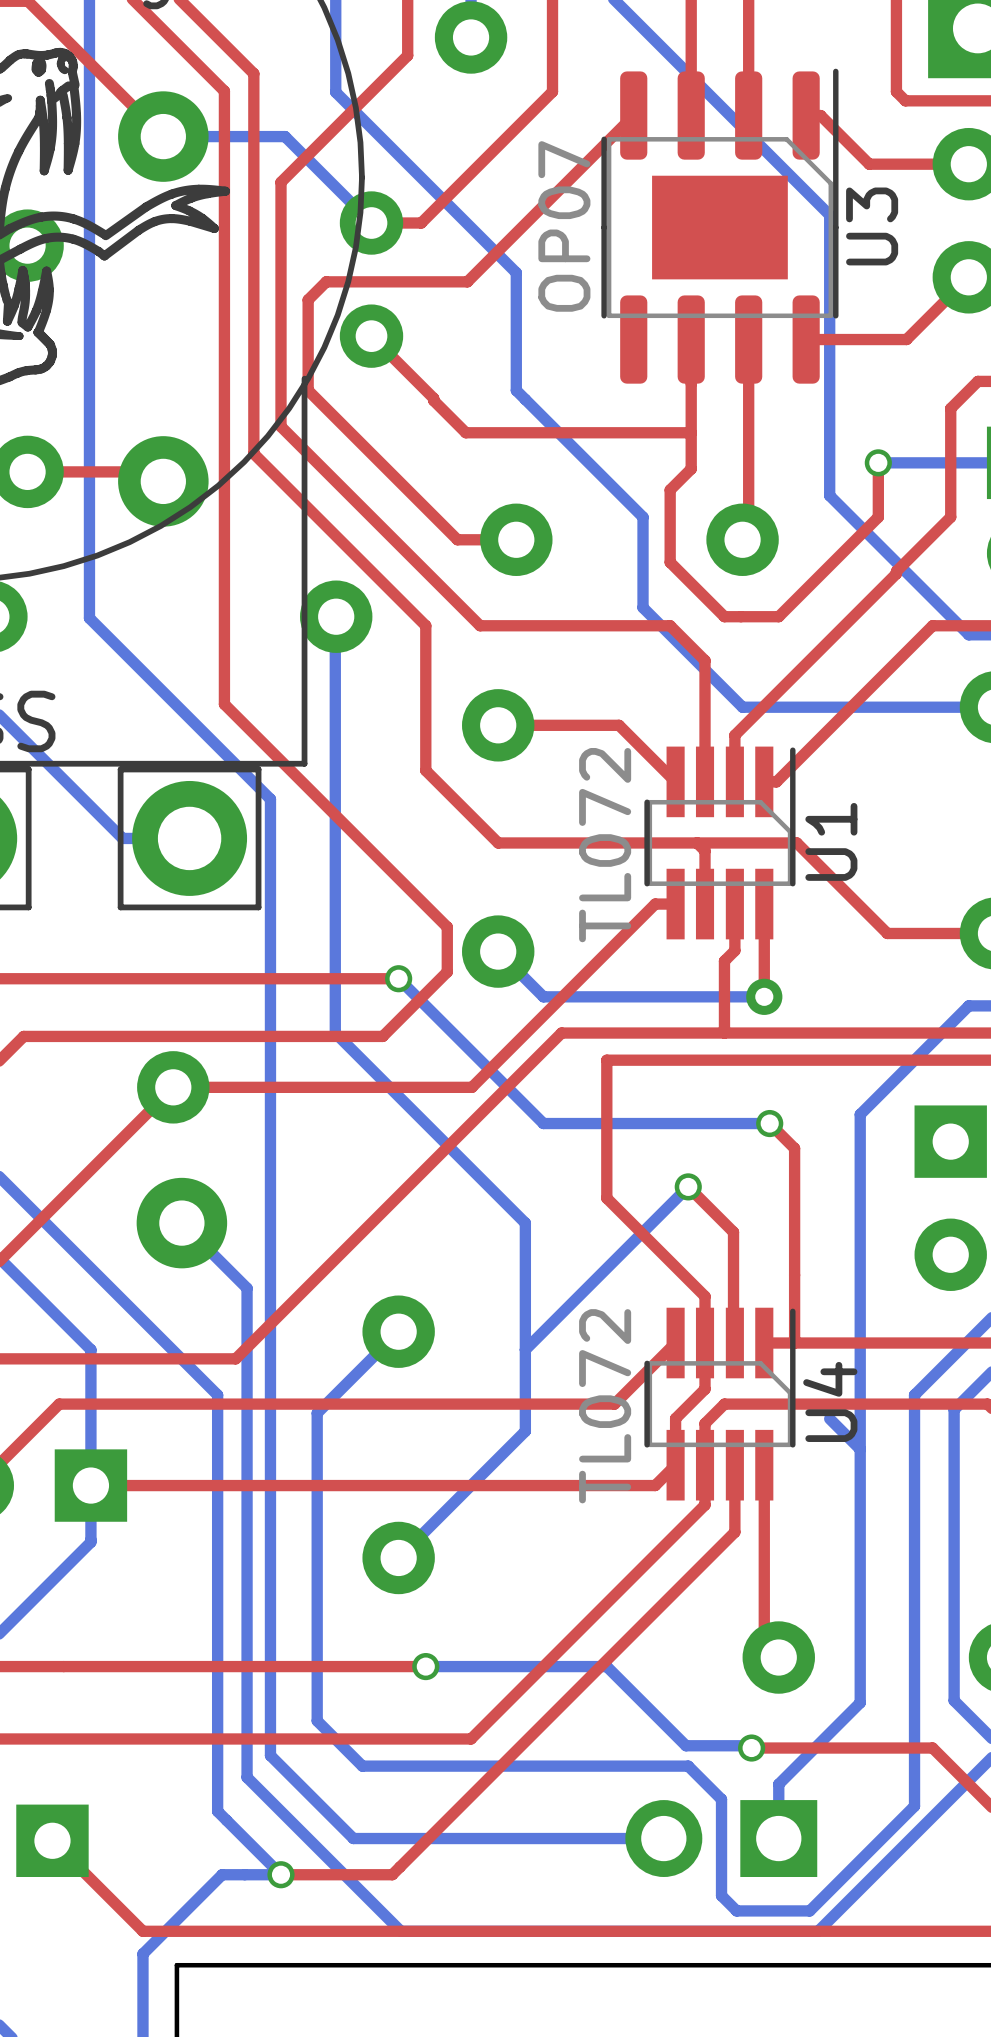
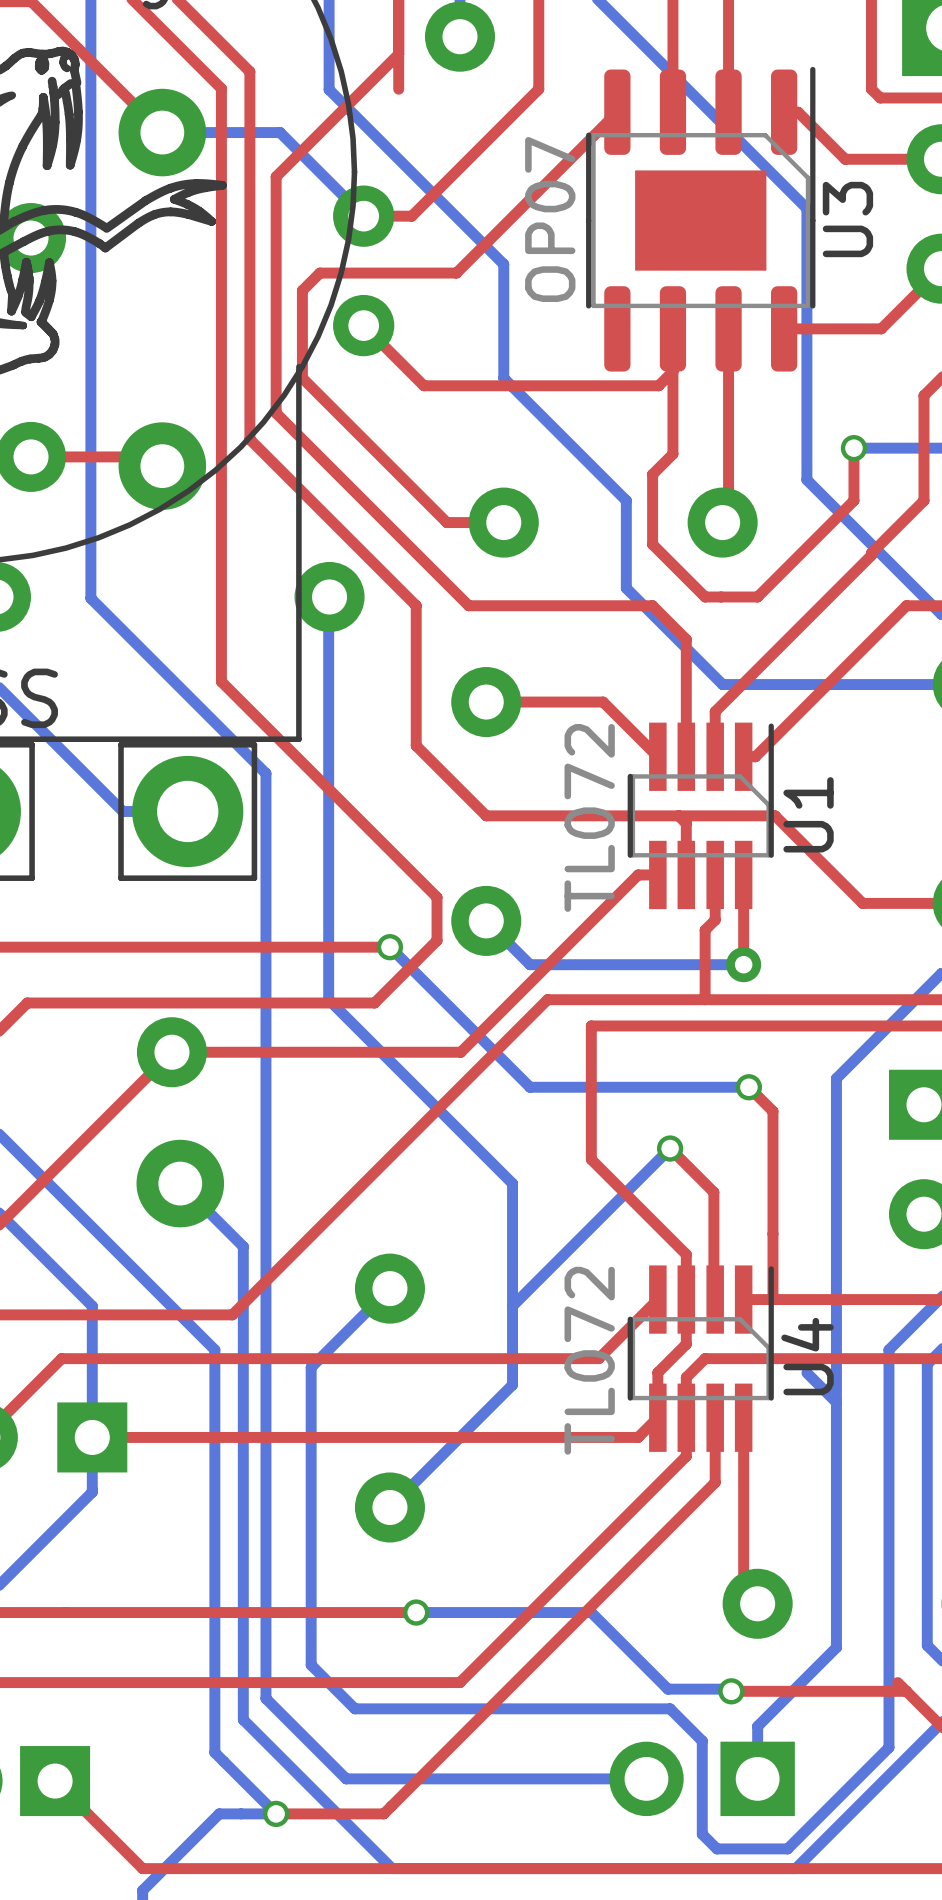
top track: none -> (398, 54) (398, 89)
top track: (433, 398) (433, 400) (465, 432) (691, 432) -> (423, 385) (658, 385) (672, 371)
top track: none -> (897, 1682) (906, 1691)

